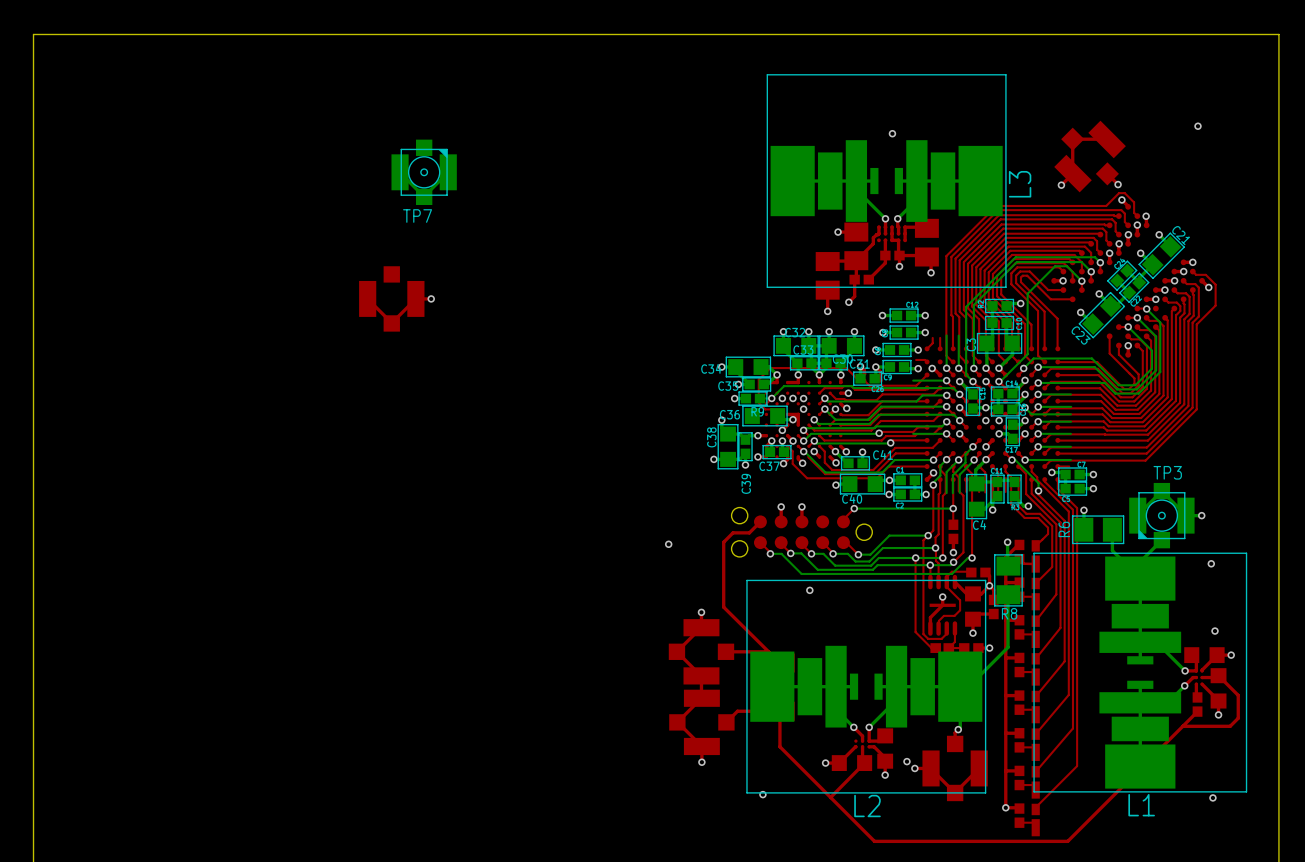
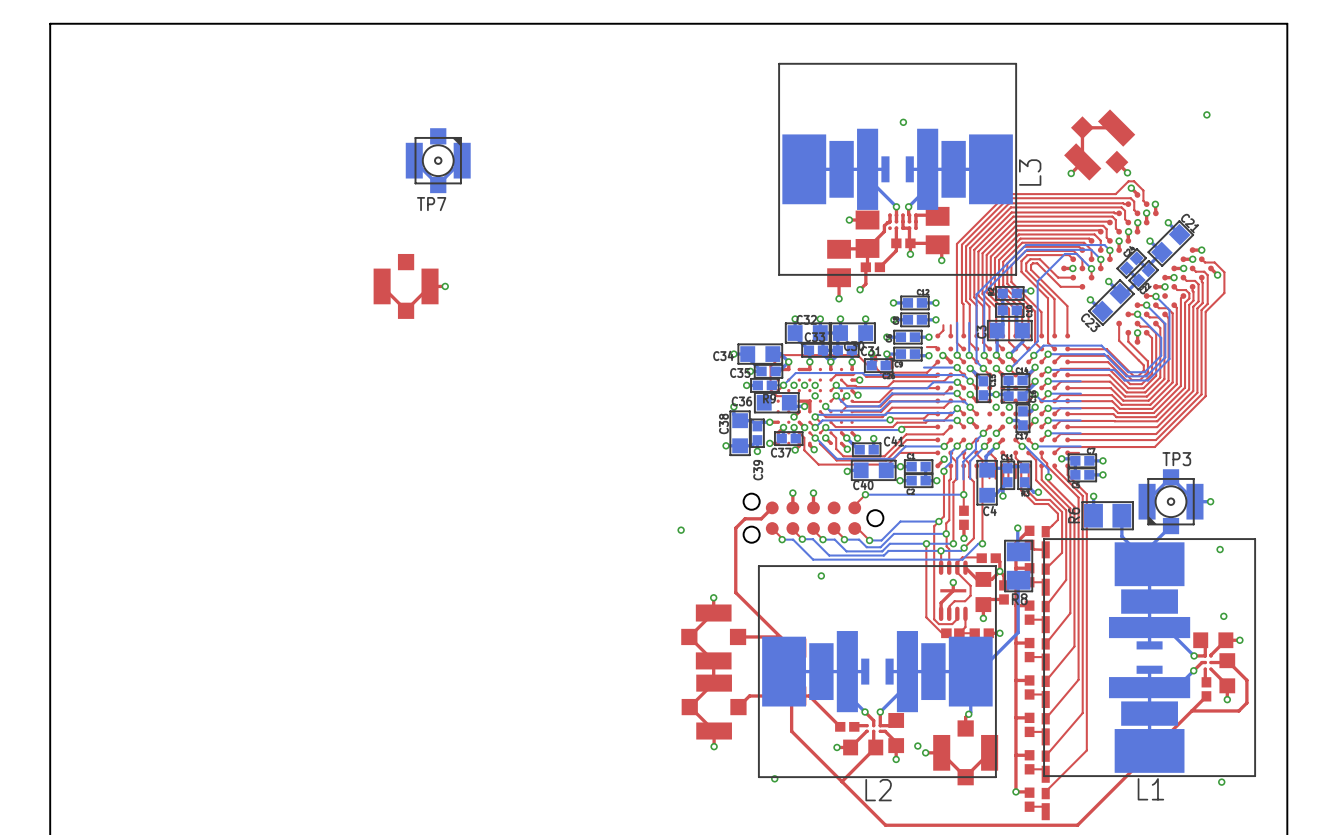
top track: none -> (791, 696) (809, 696) (840, 726)
top track: none -> (867, 725) (854, 726)
part: none -> (847, 726)

